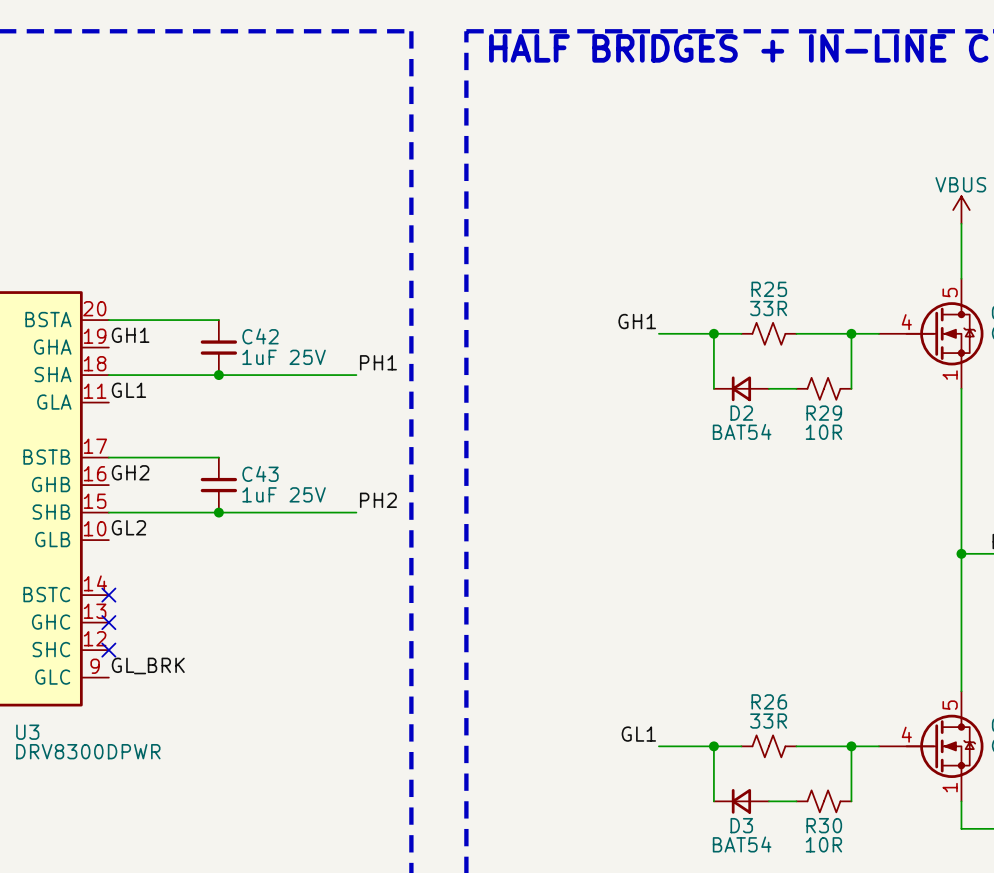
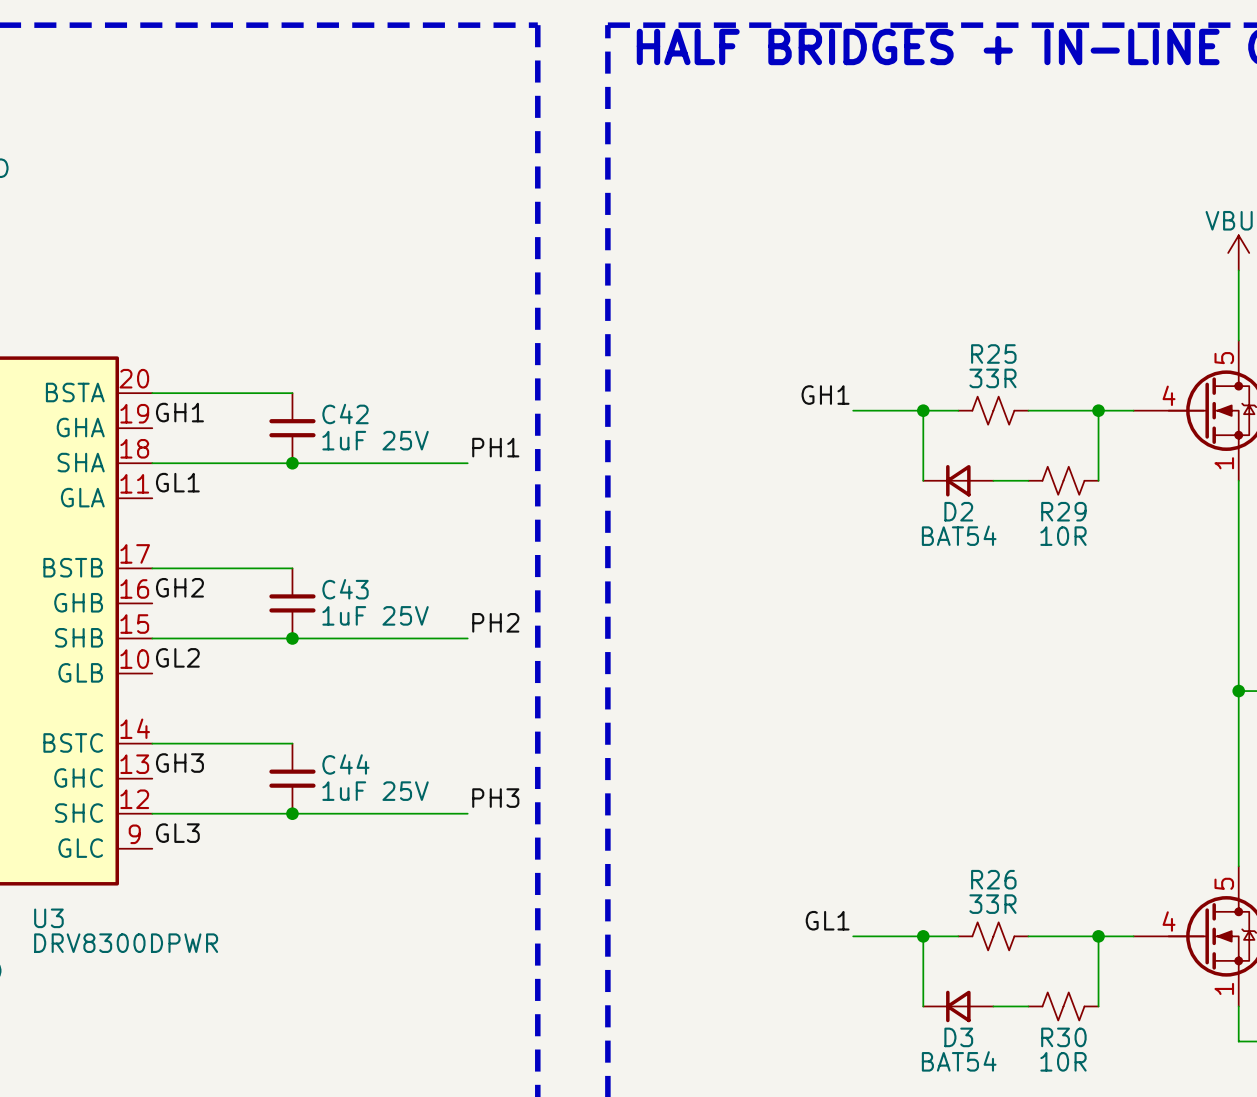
wire: none -> (152, 743) (292, 743)
no-connect mark: (108, 595) -> none
label: none -> GH3 (179, 763)
no-connect mark: (108, 622) -> none
C44: none -> 1uF 25V (292, 778)
label: none -> PH3 (495, 798)
wire: none -> (152, 813) (467, 813)
no-connect mark: (108, 650) -> none
junction: none -> (292, 813)
label: GL_BRK (148, 665) -> GL3 (177, 833)

